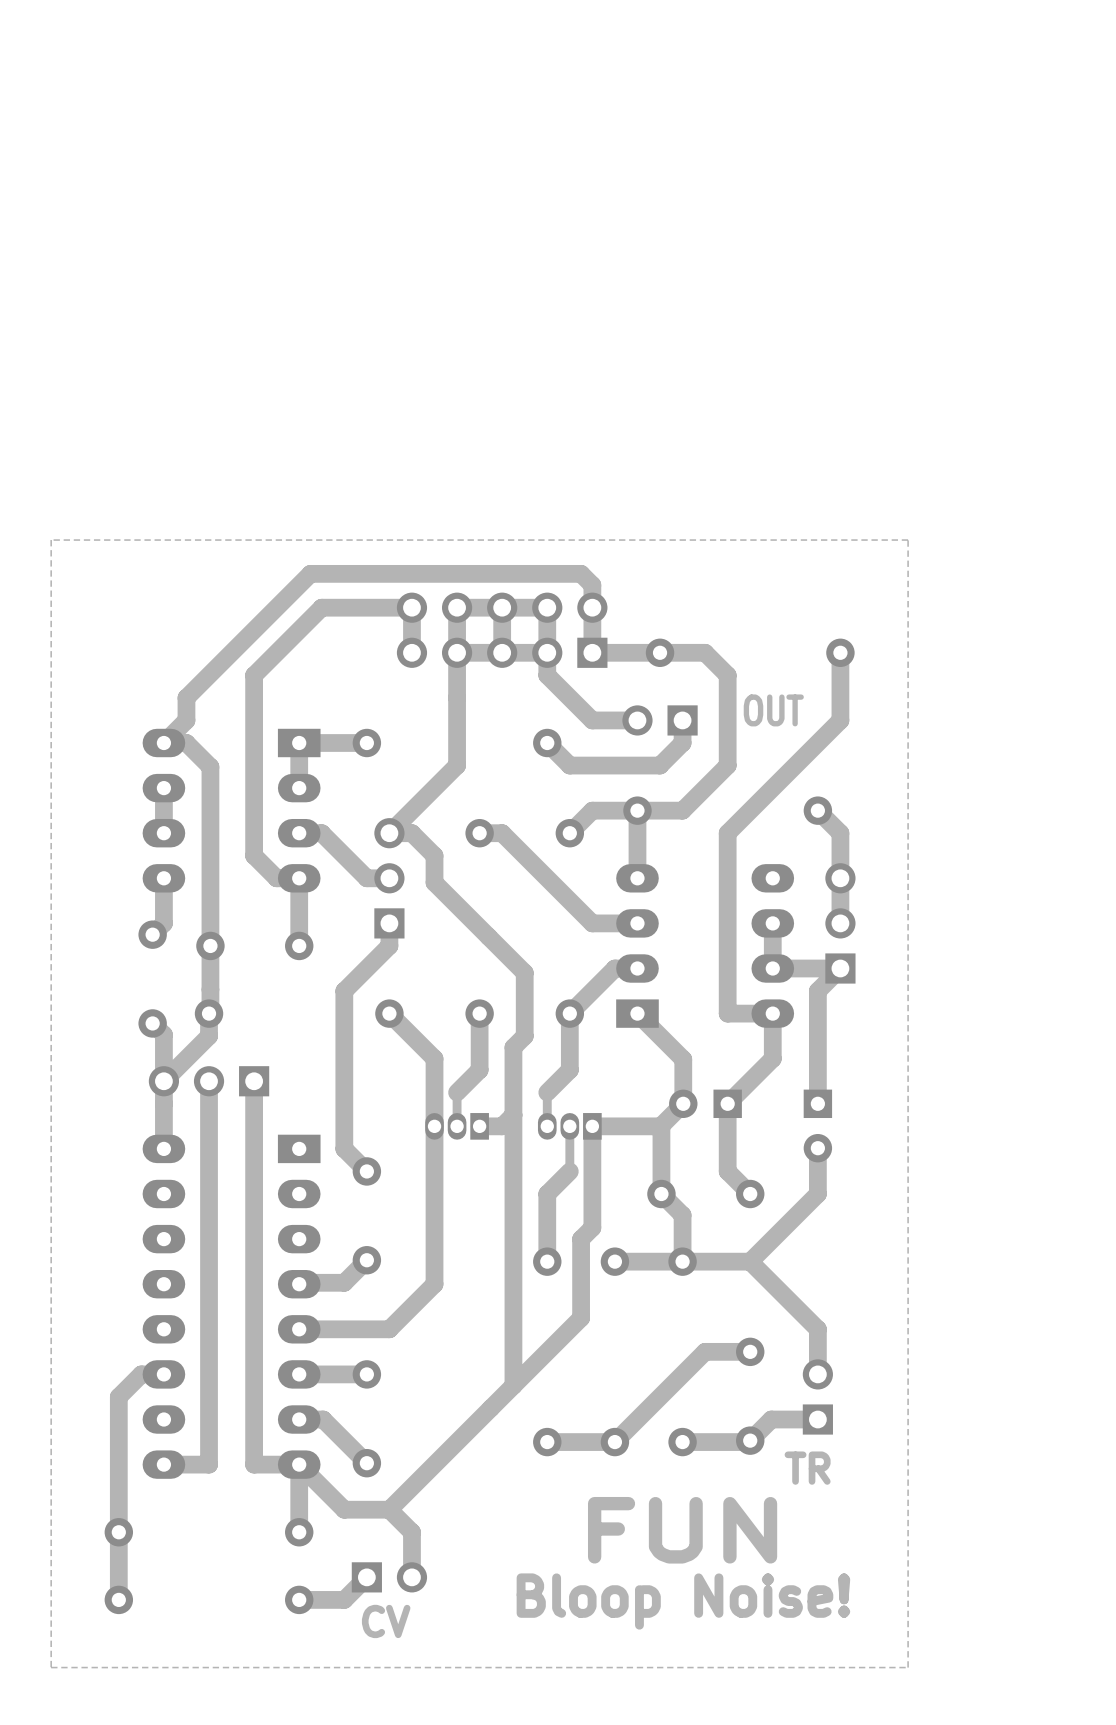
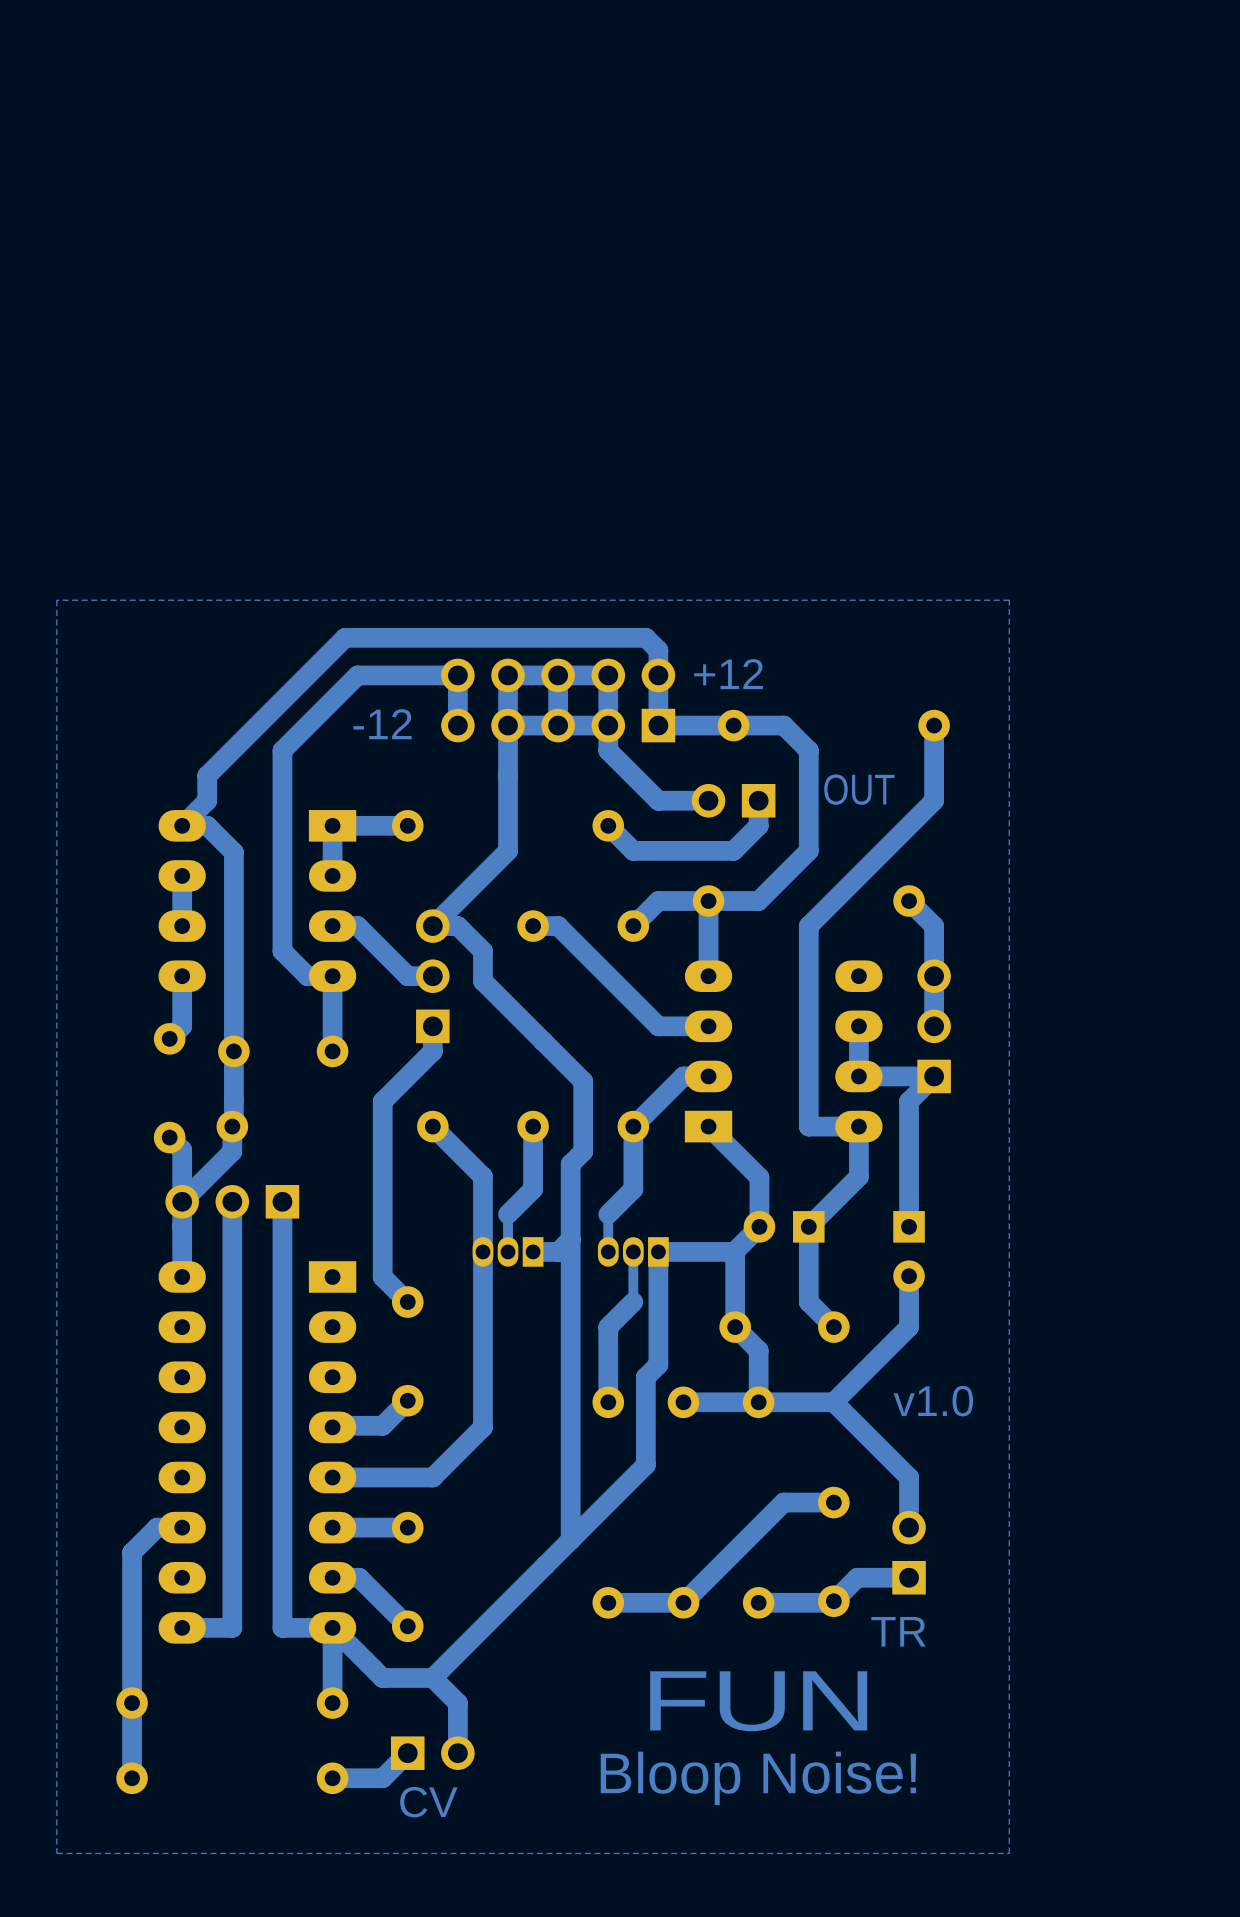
text: none -> +12 (728, 674)
text: none -> -12 (382, 724)
text: none -> v1.0 (933, 1401)

